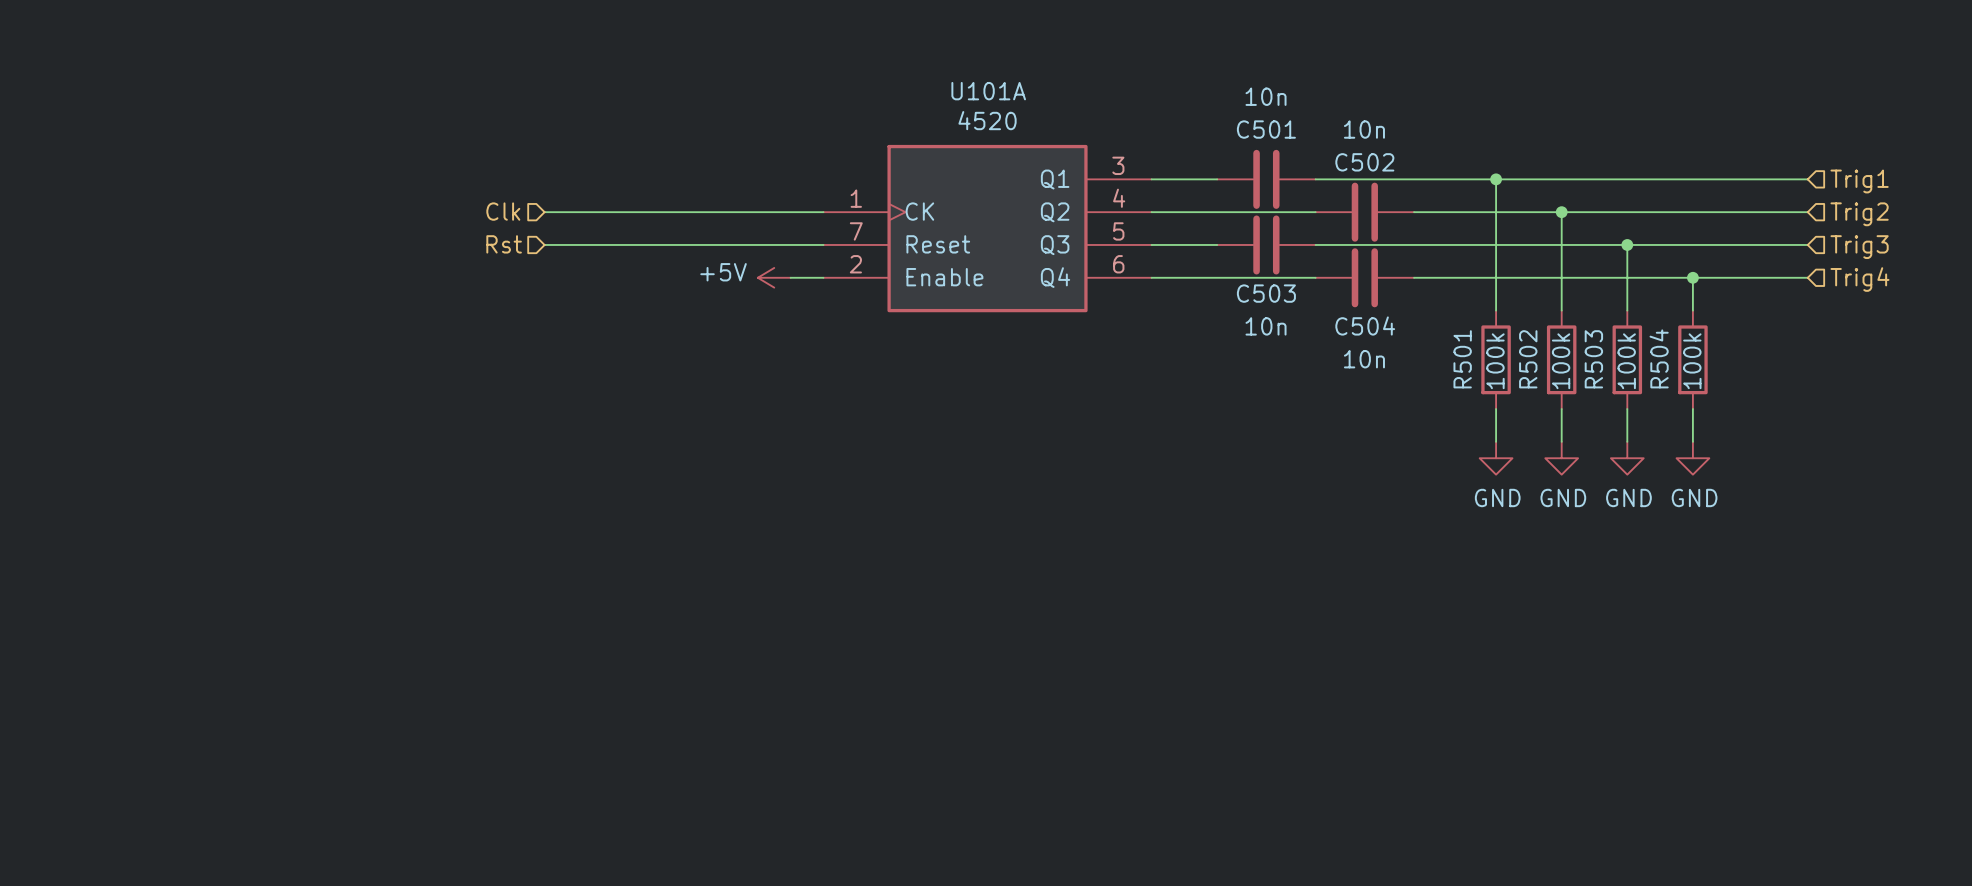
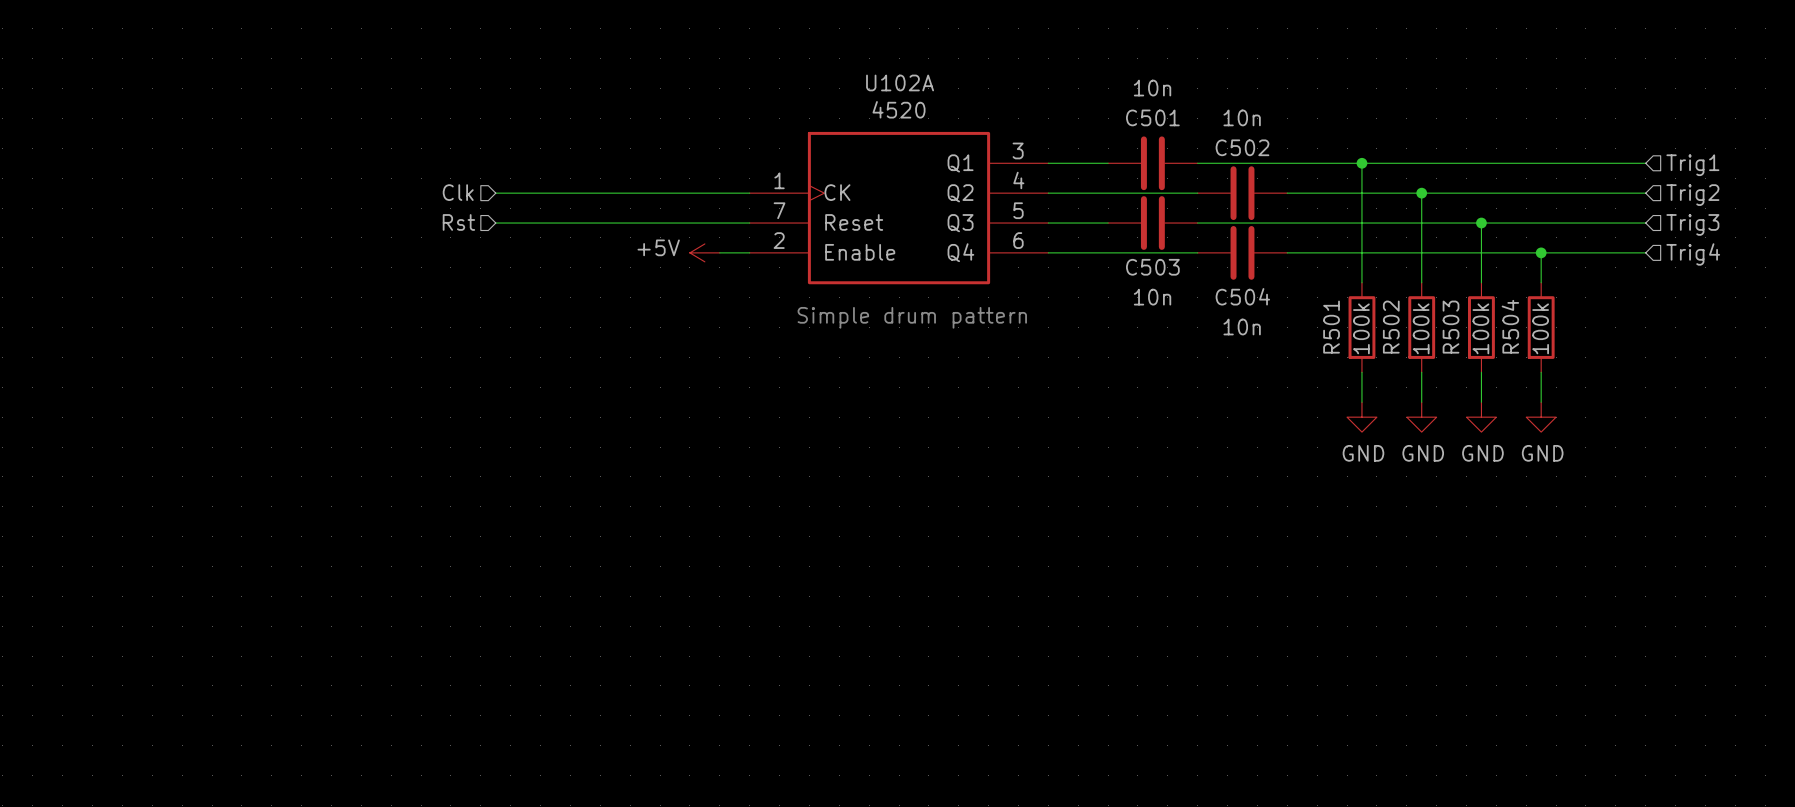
U101A name: U101A (988, 91) -> U102A (900, 82)
text: none -> Simple drum pattern (912, 317)

